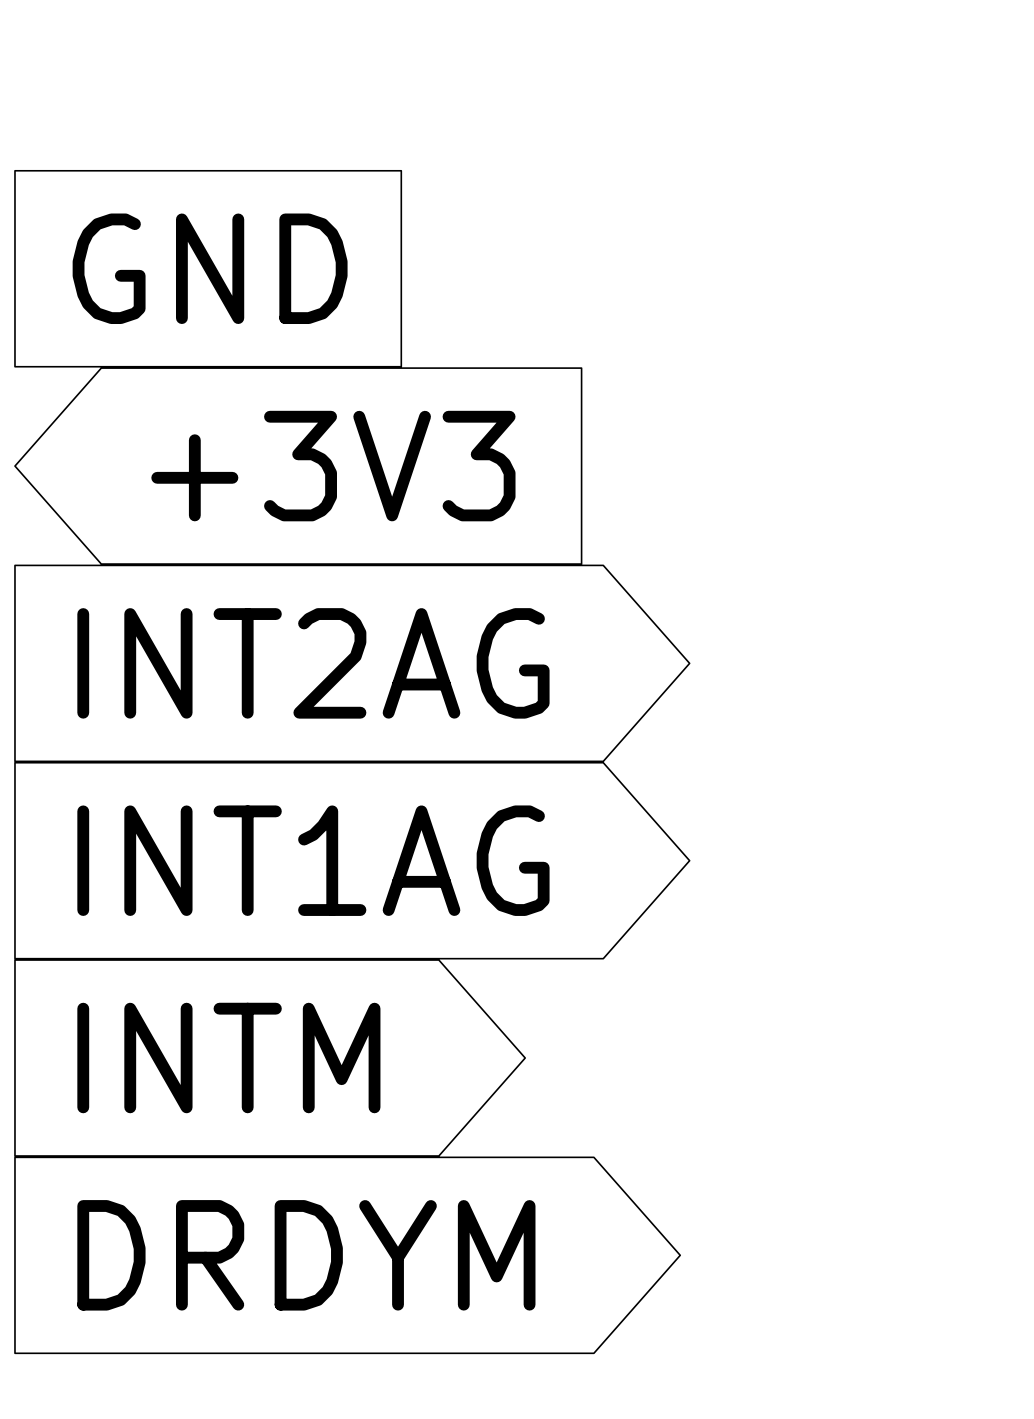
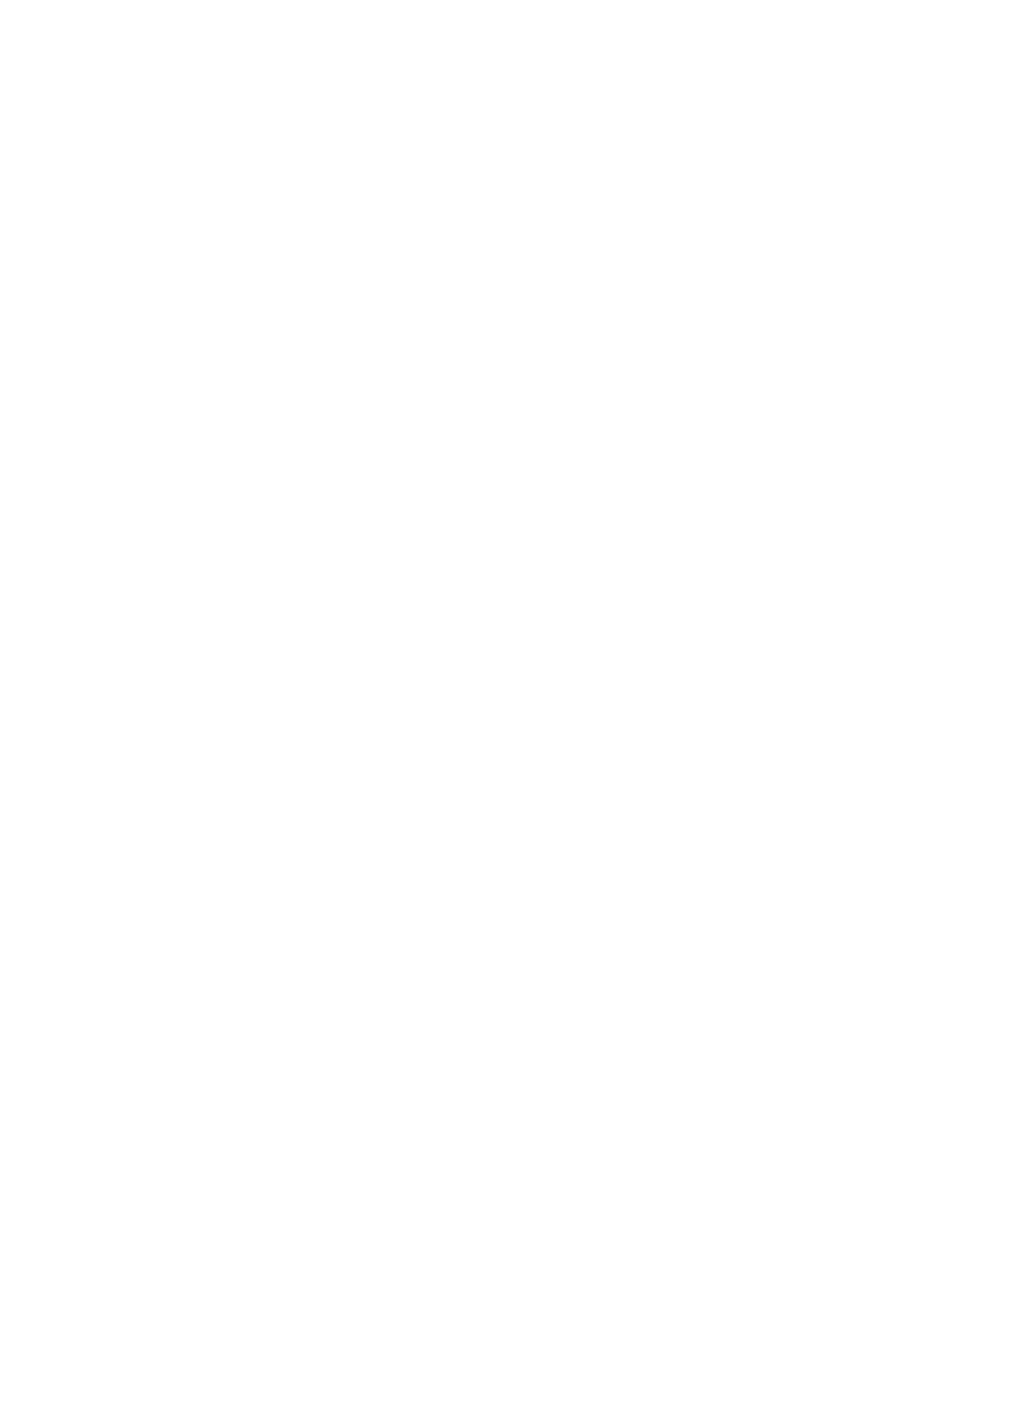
global label: GND (210, 268) -> none
global label: +3V3 (333, 466) -> none
global label: INT2AG (313, 663) -> none
global label: INT1AG (313, 860) -> none
global label: INTM (228, 1058) -> none
global label: DRDYM (306, 1255) -> none

